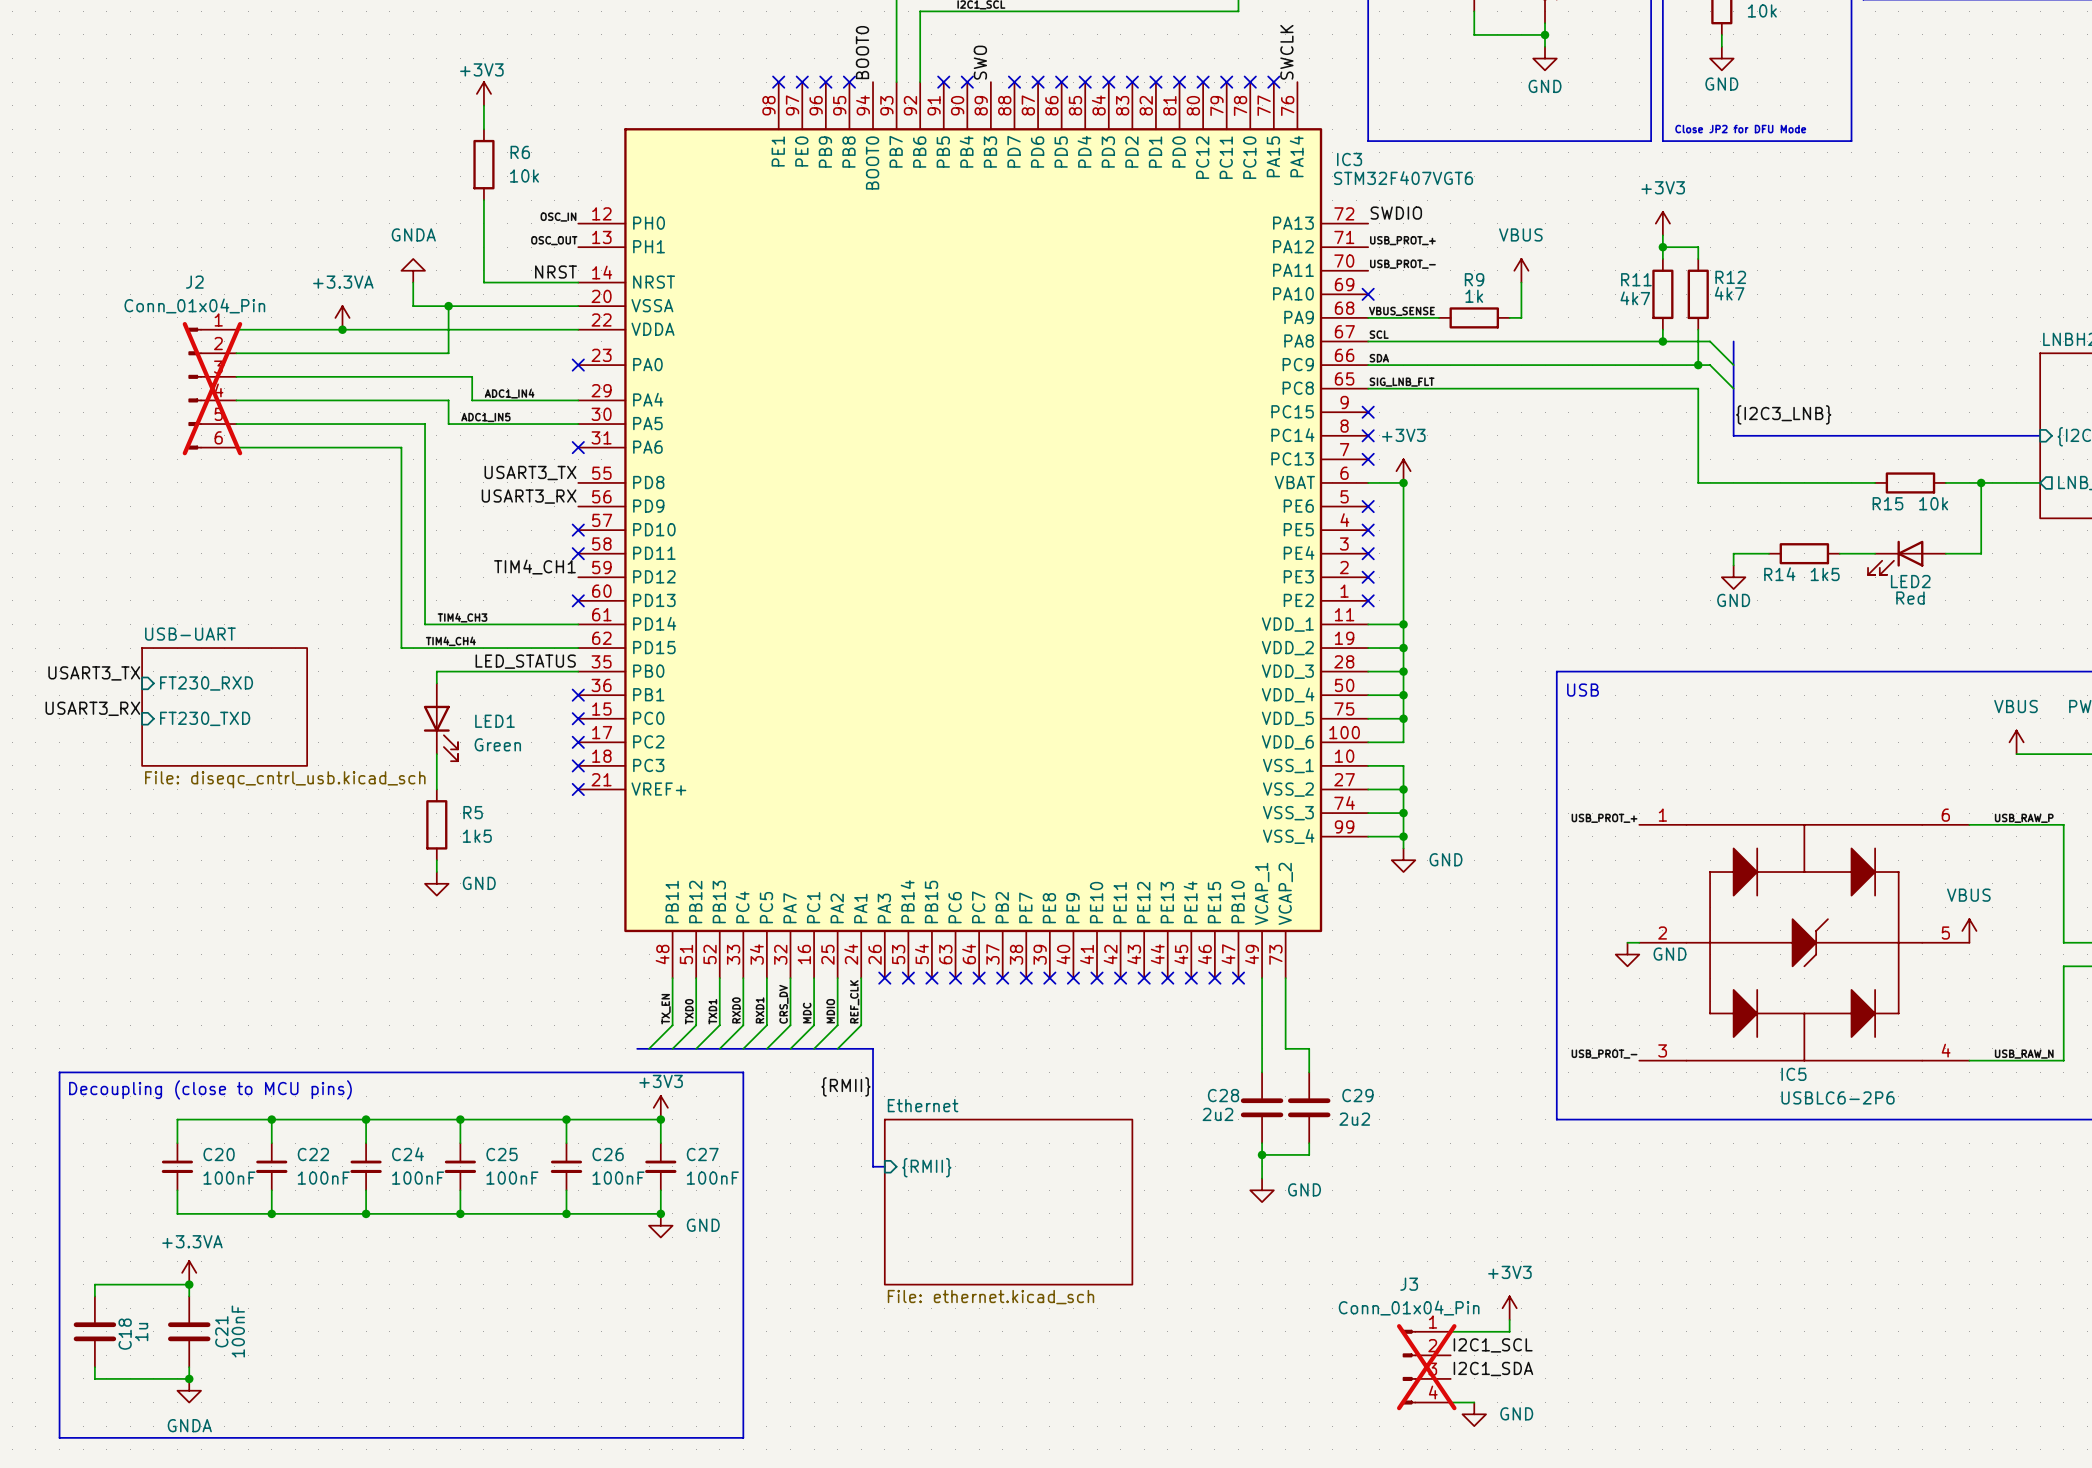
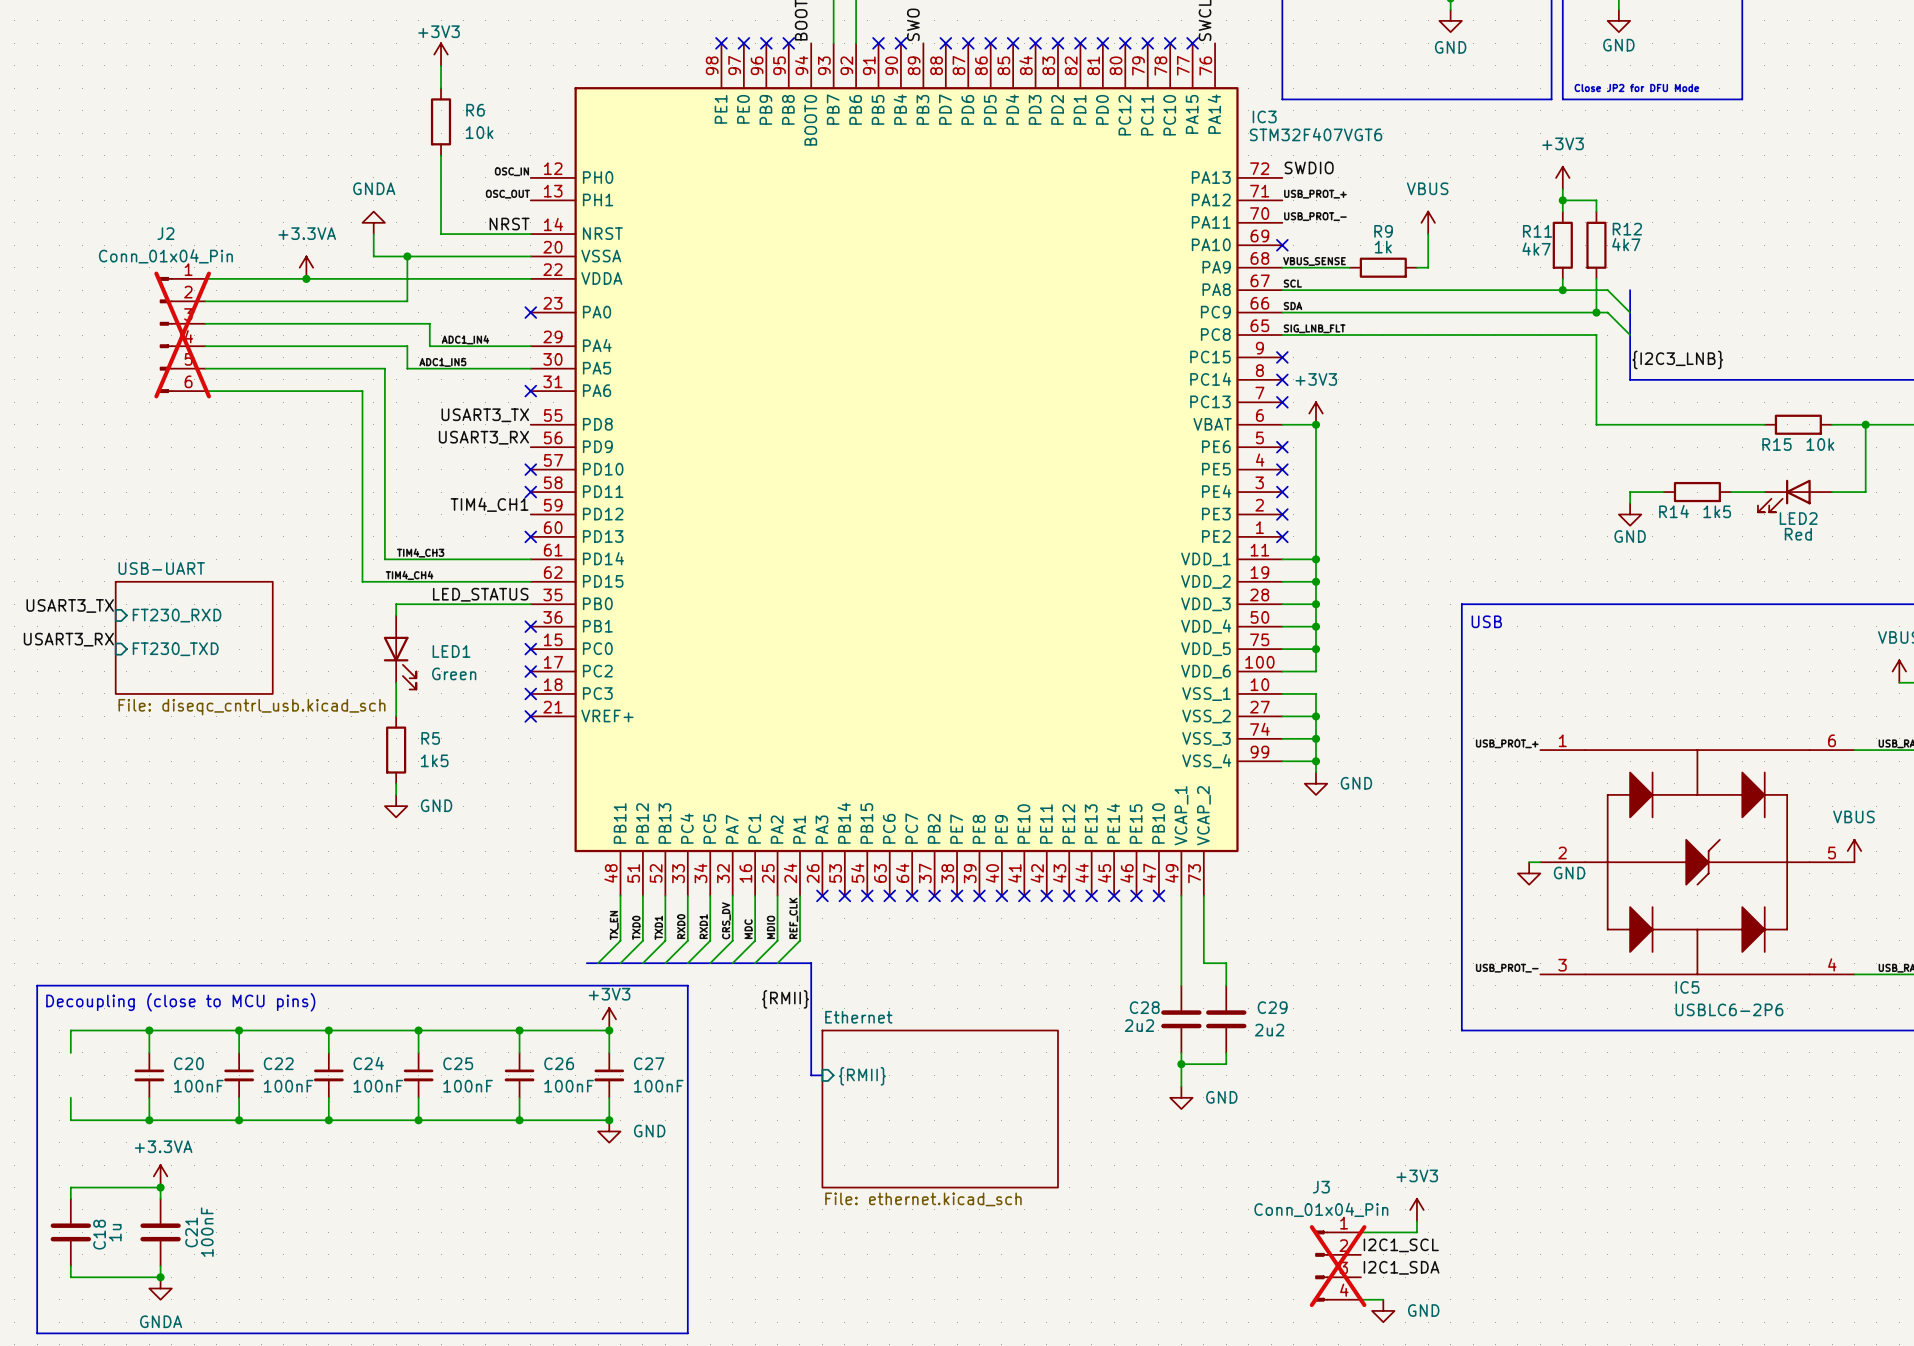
wire: none -> (149, 1030) (70, 1030) (70, 1052)
junction: none -> (149, 1030)
wire: none -> (70, 1097) (70, 1120) (149, 1120)
junction: none -> (149, 1120)

